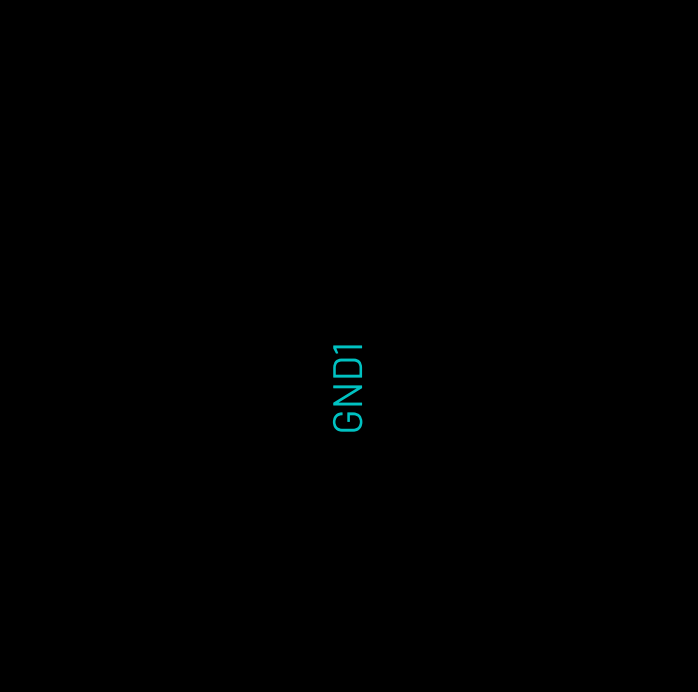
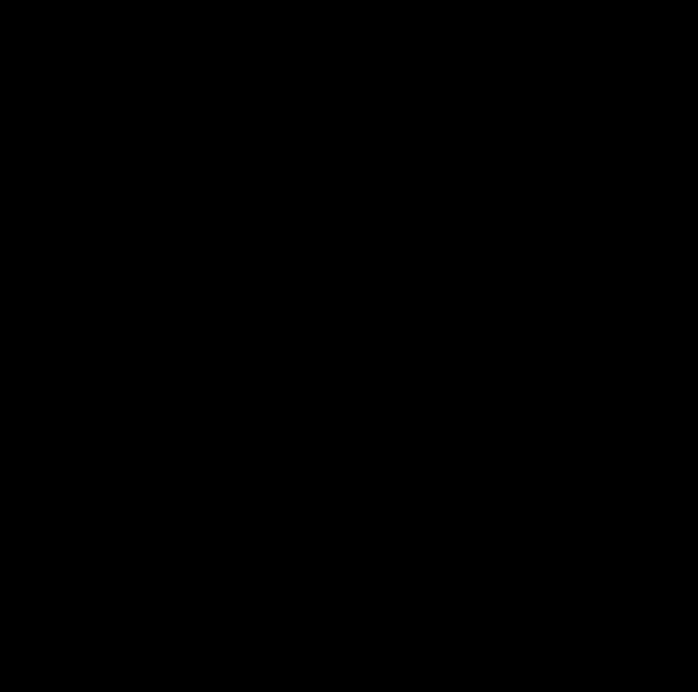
drawing: [332, 345, 363, 432] -> none

